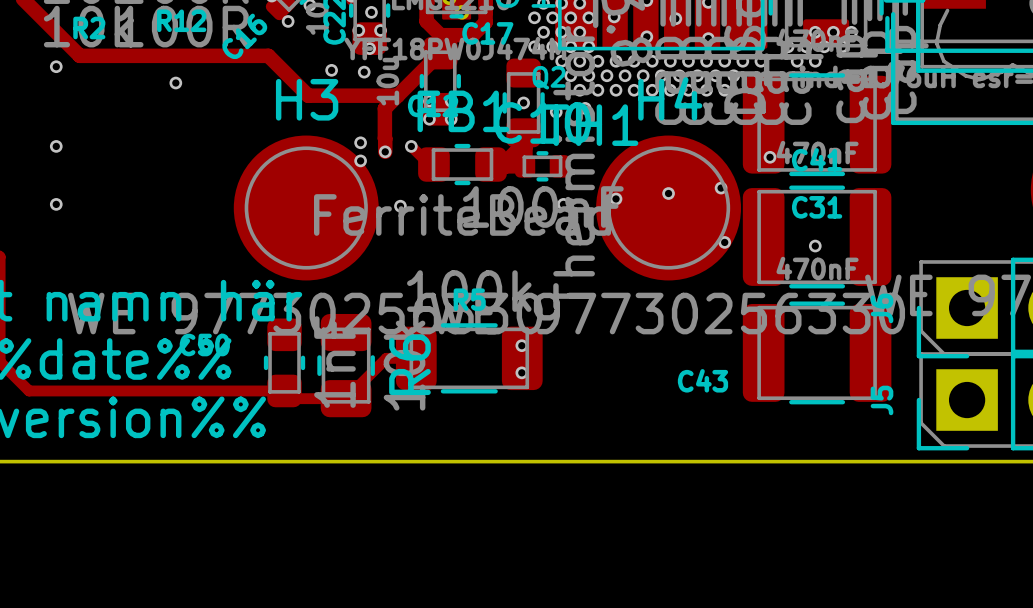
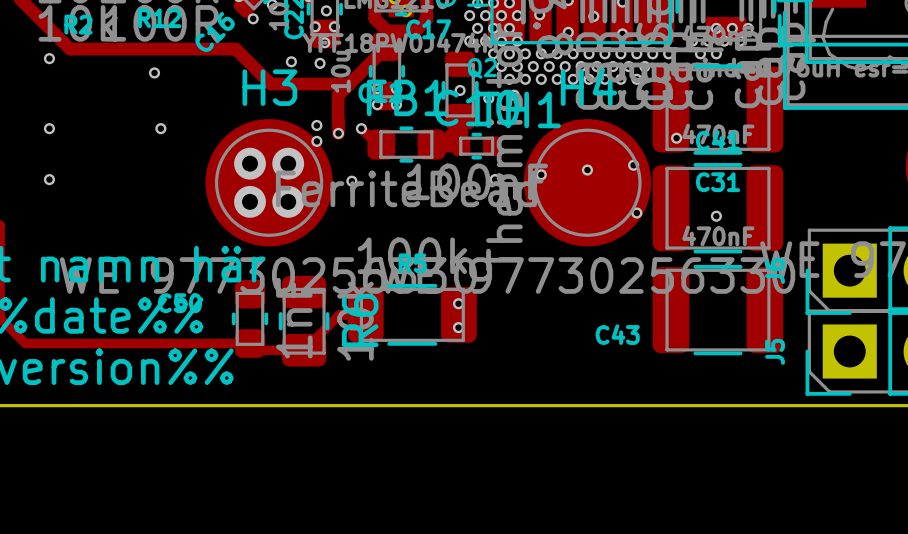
via: none -> (160, 128)
via: none -> (250, 163)
via: none -> (288, 163)
via: none -> (250, 201)
via: none -> (288, 201)

